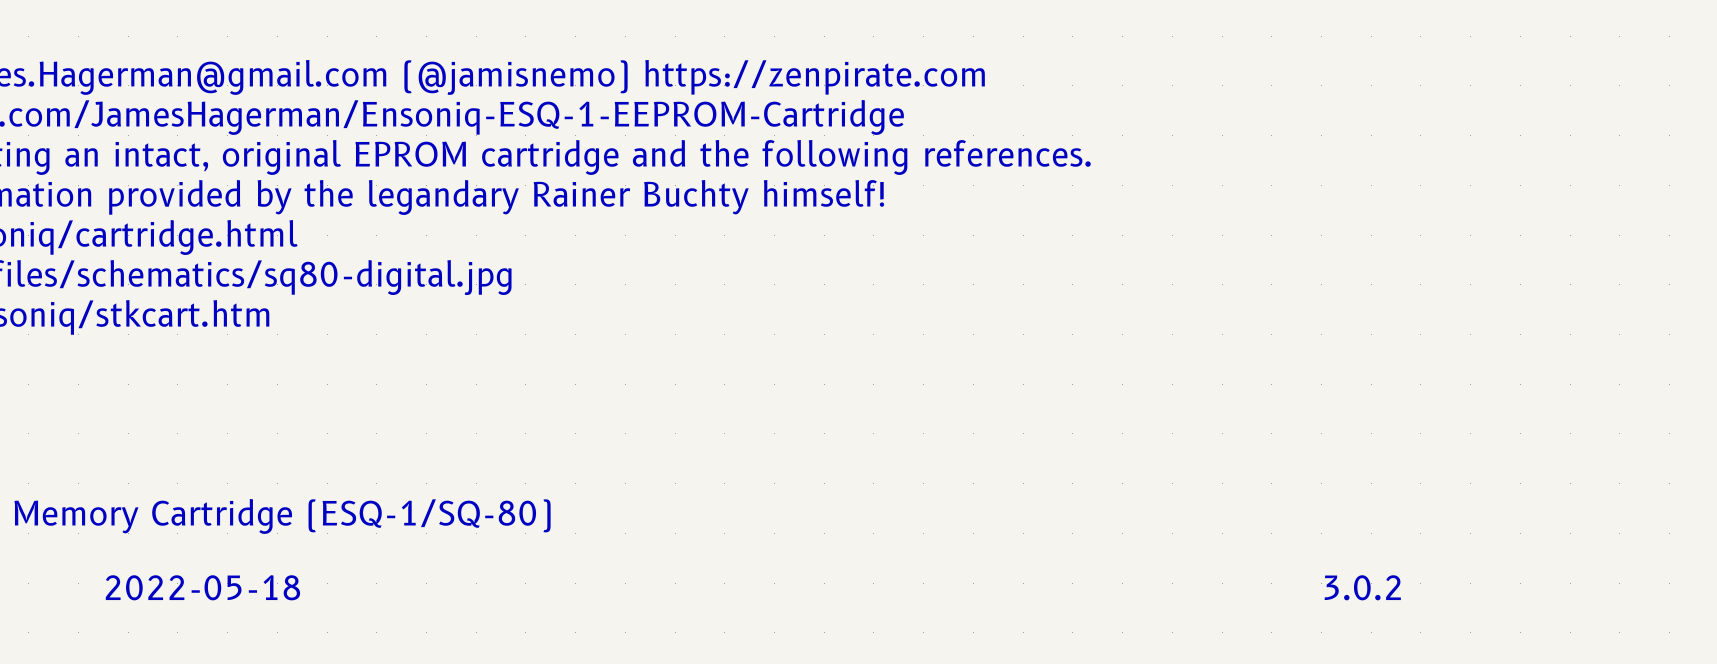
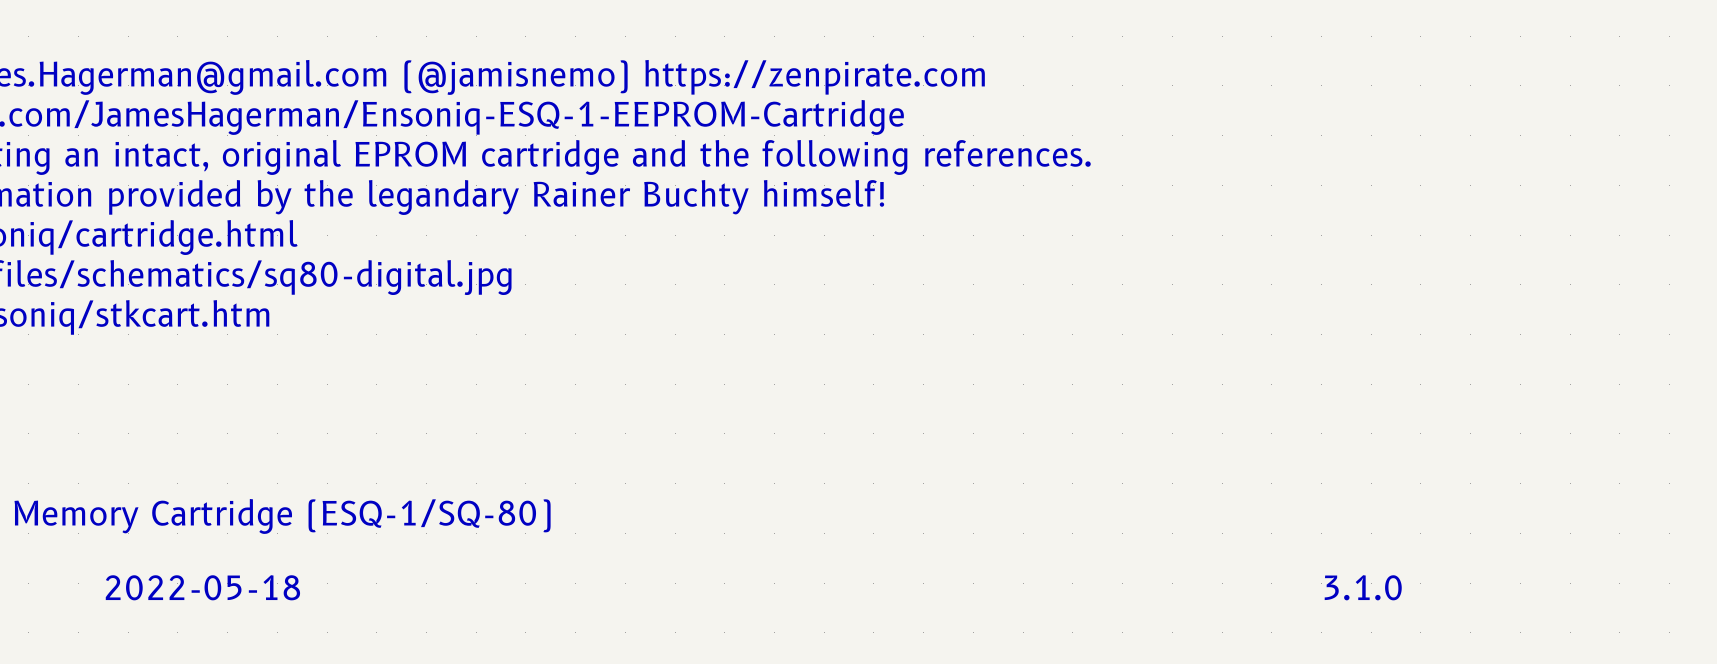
text: 3.0.2 (1362, 587) -> 3.1.0 (1363, 587)

